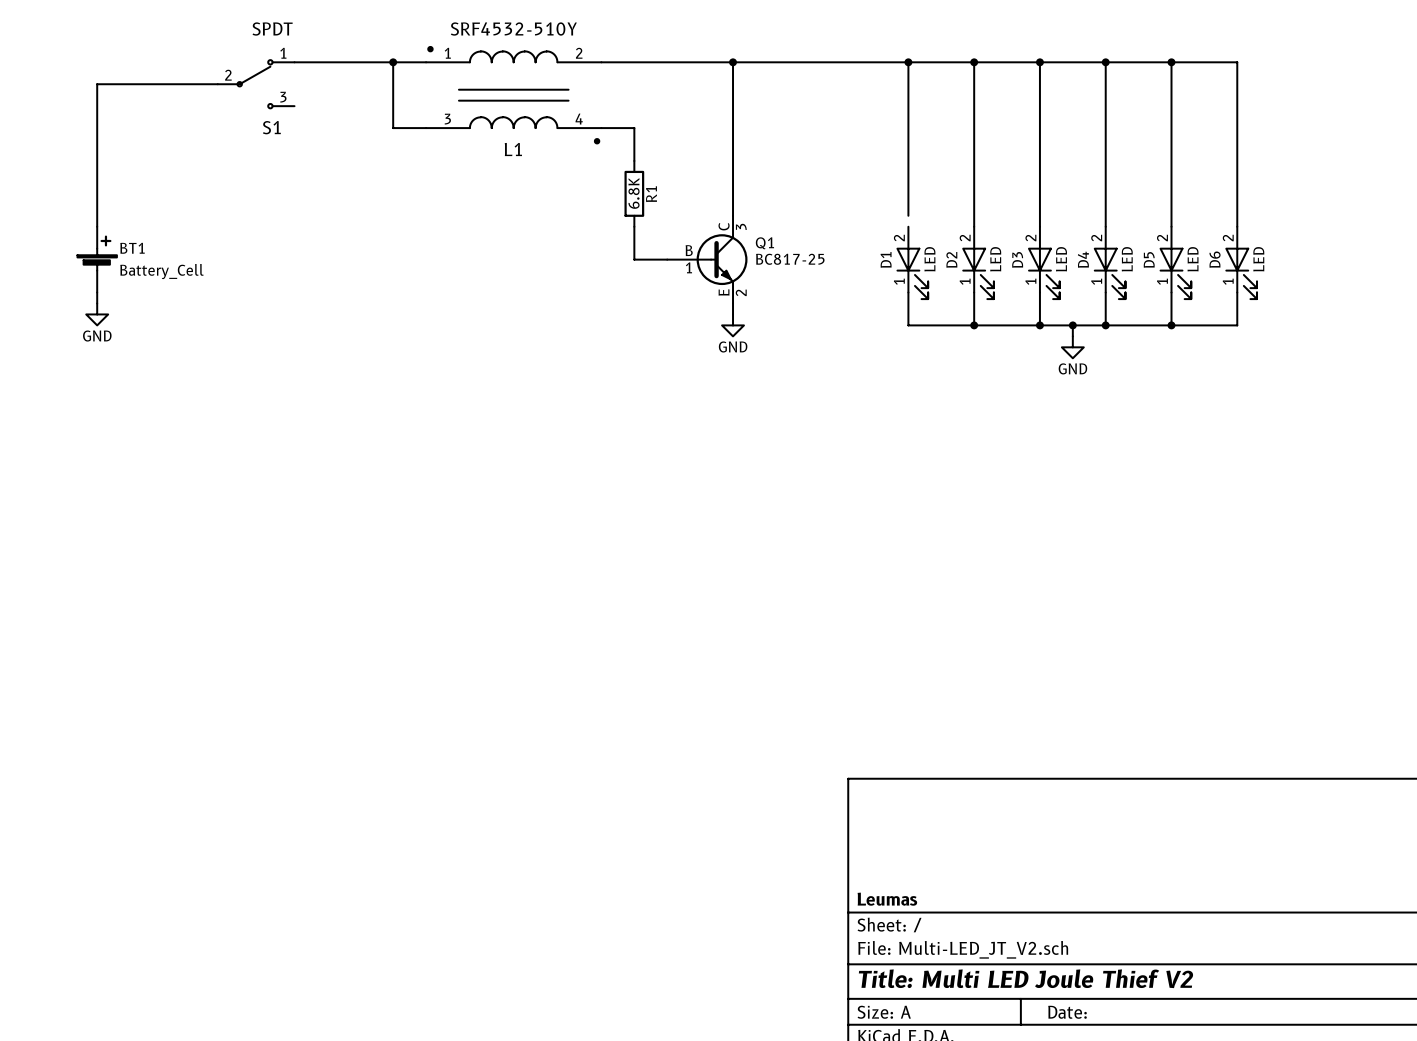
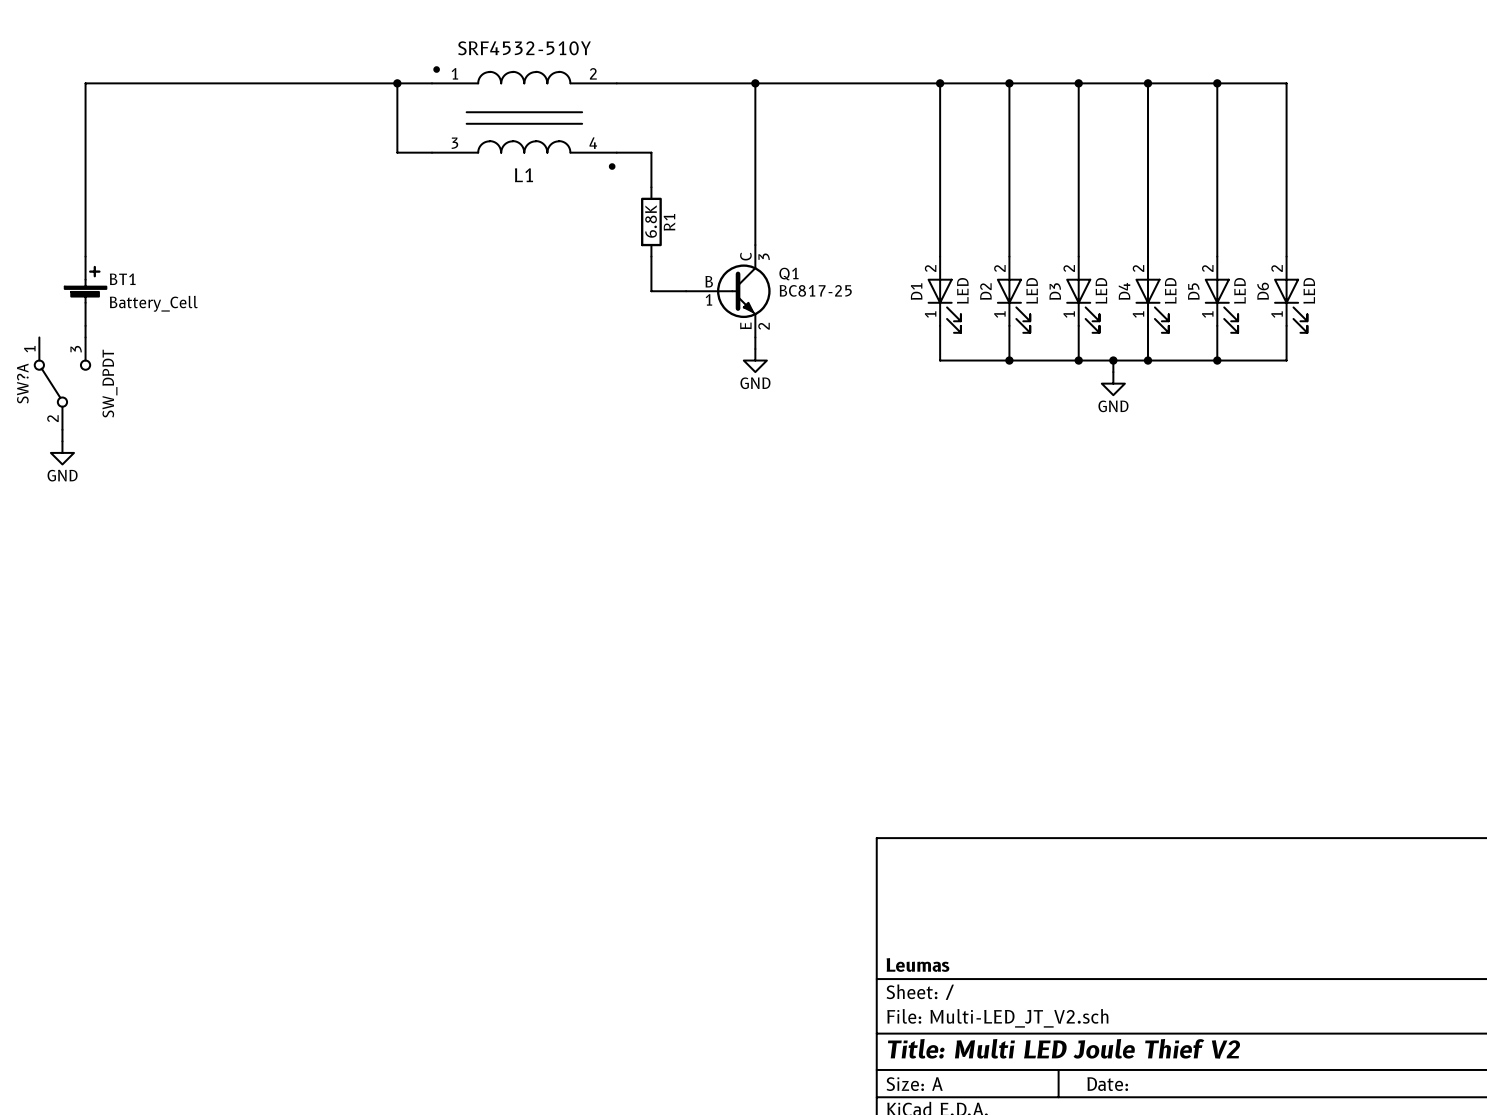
wire: (97, 84) (217, 84) -> (85, 106) (85, 83) (293, 83)
S1: SPDT (256, 84) -> none
wire: none -> (940, 245) (940, 256)
power symbol position: GND (97, 314) -> GND (62, 452)
SW?A: none -> SW_DPDT (62, 383)
wire: none -> (62, 429) (62, 441)

